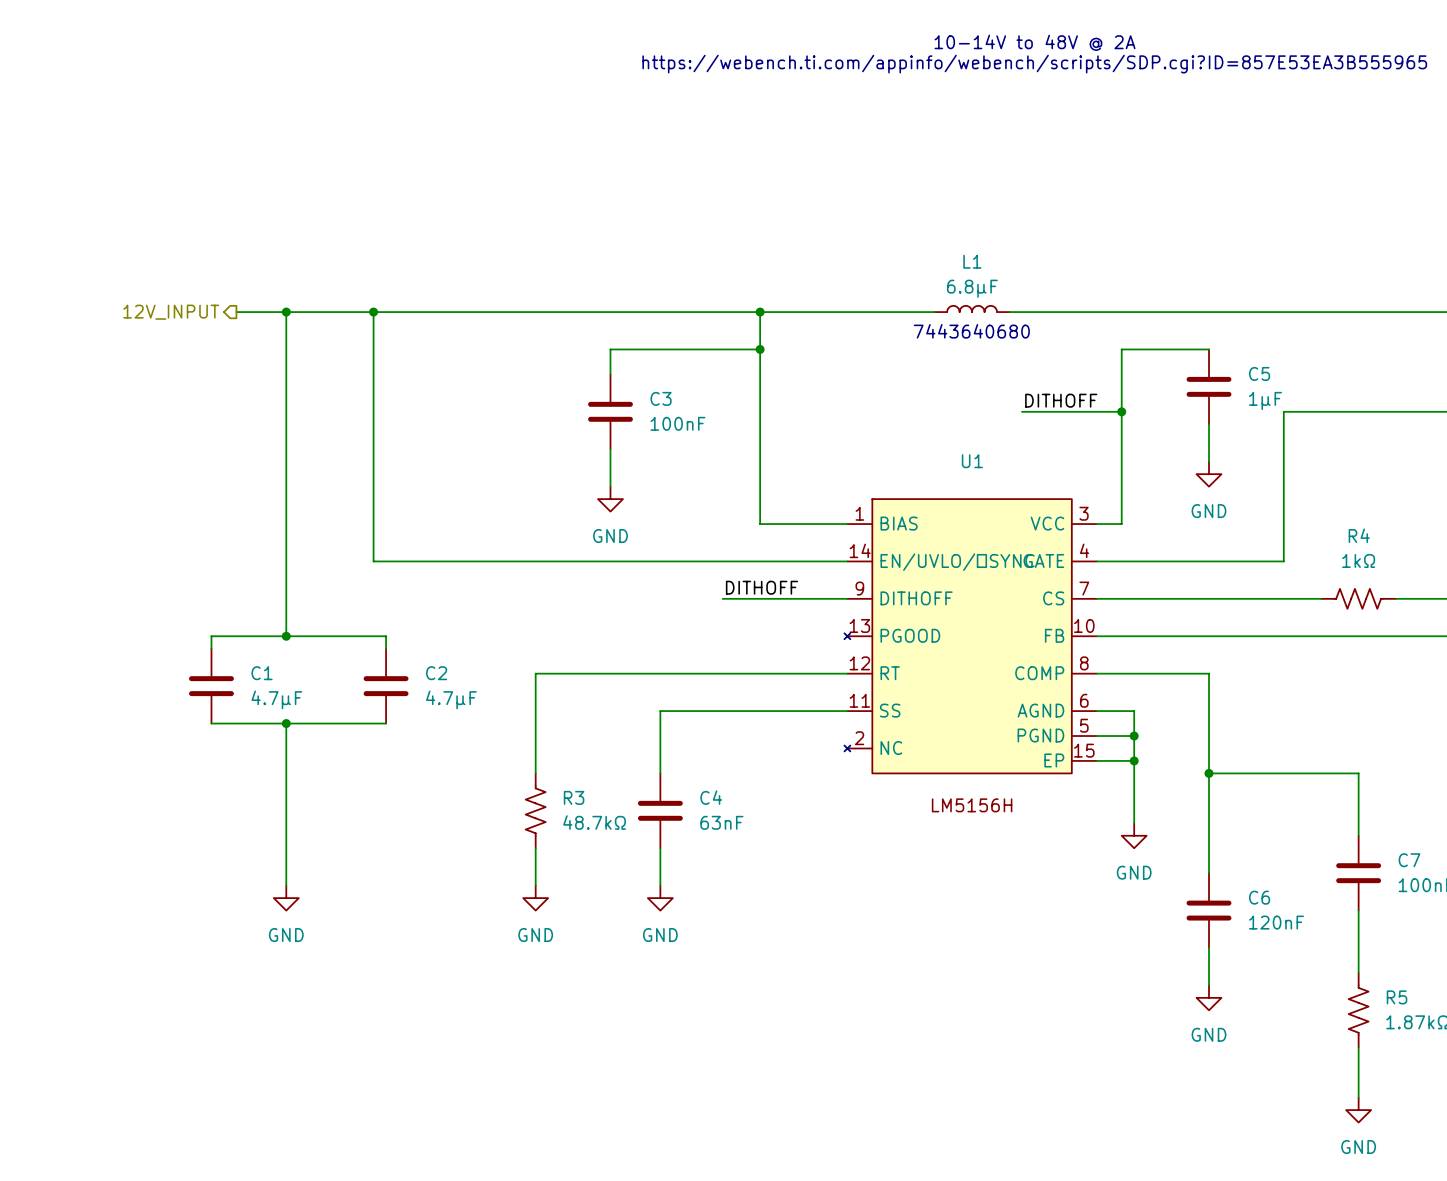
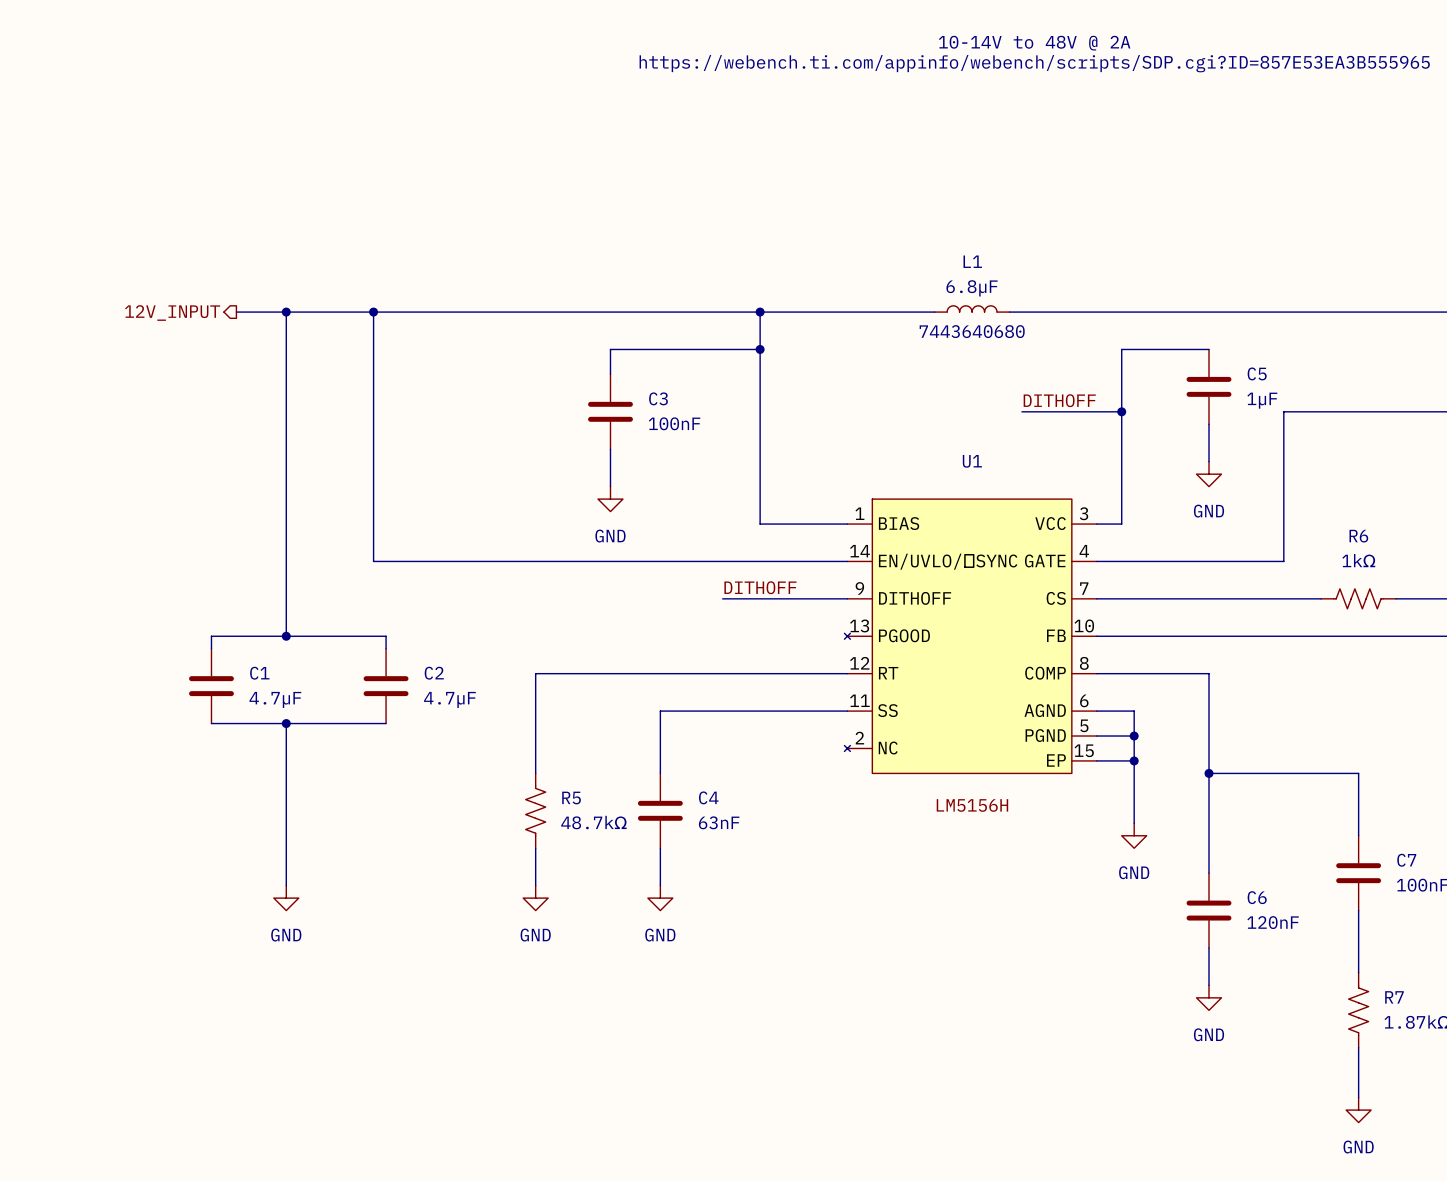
R4 name: R4 (1359, 535) -> R6 (1358, 536)
R3 name: R3 (574, 797) -> R5 (571, 798)
R5 name: R5 (1397, 997) -> R7 (1394, 997)

